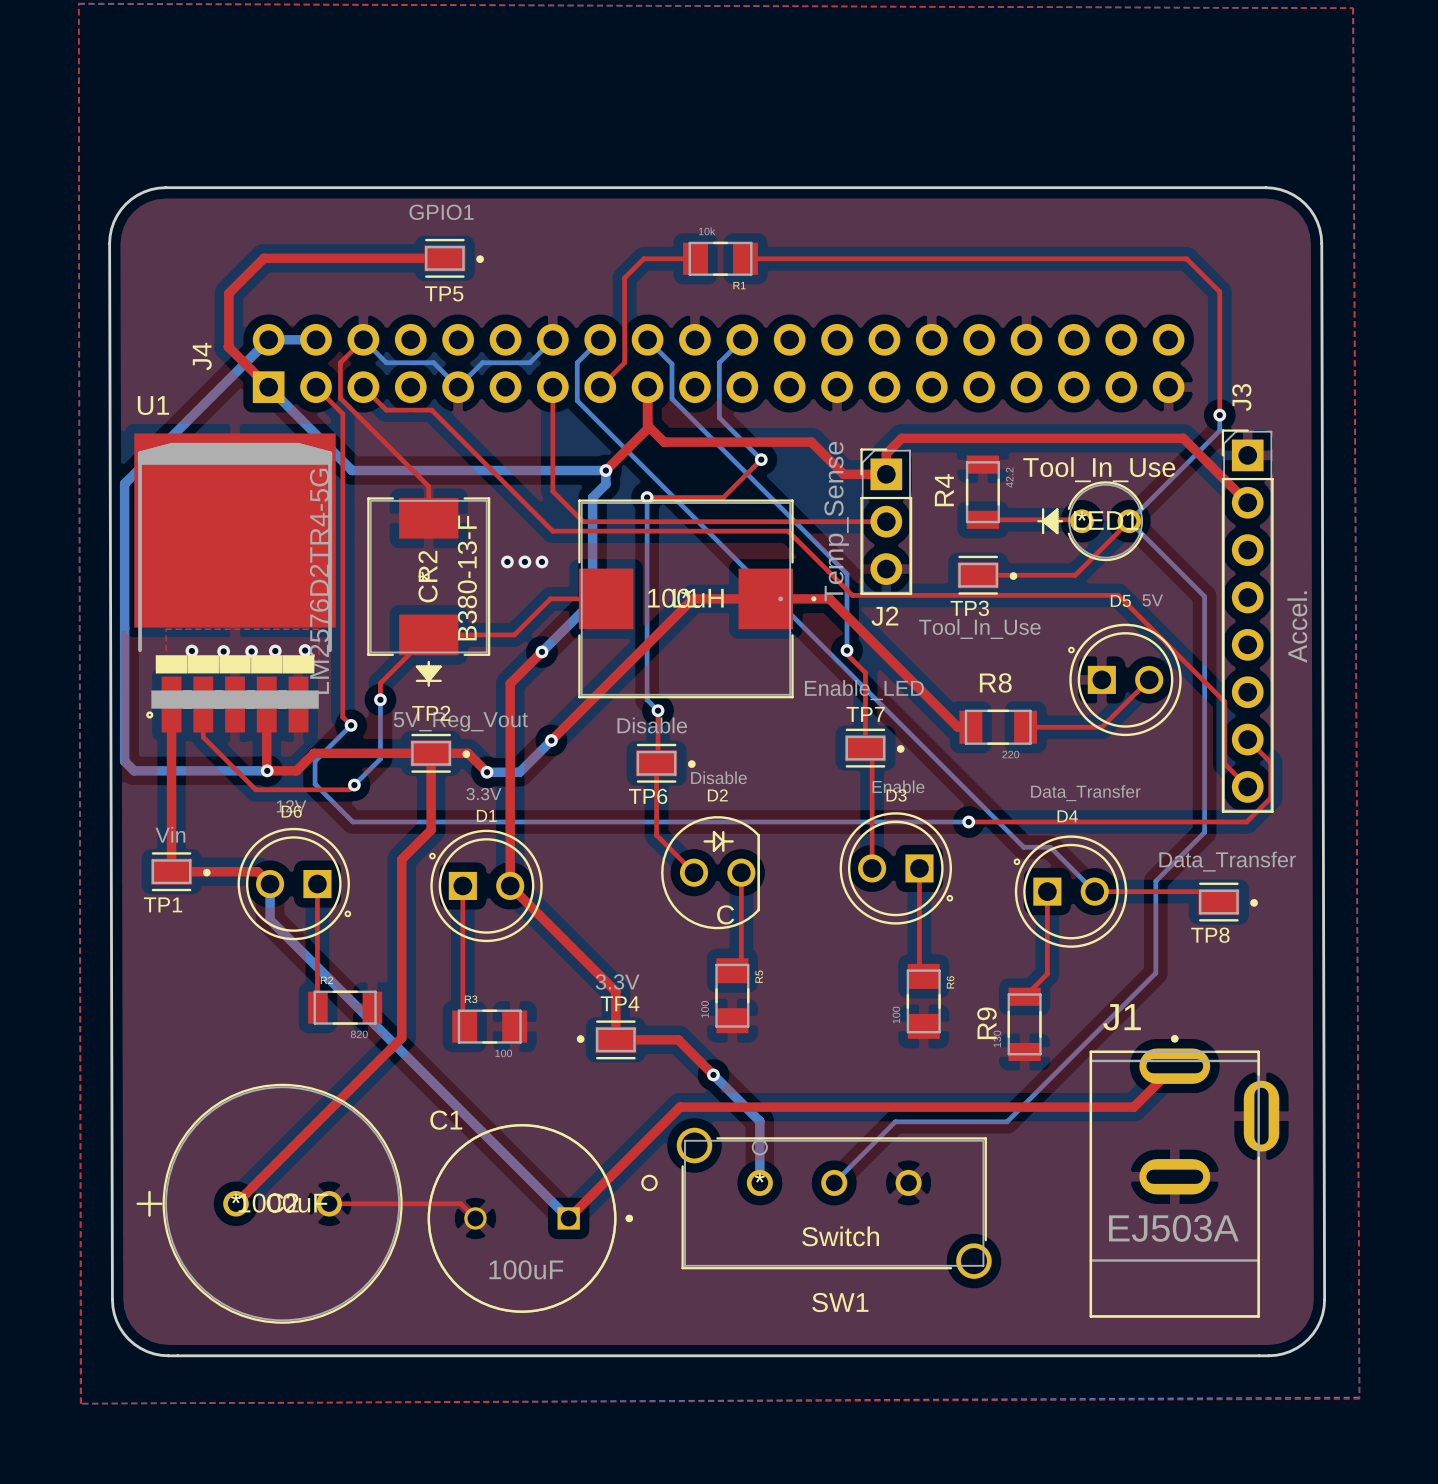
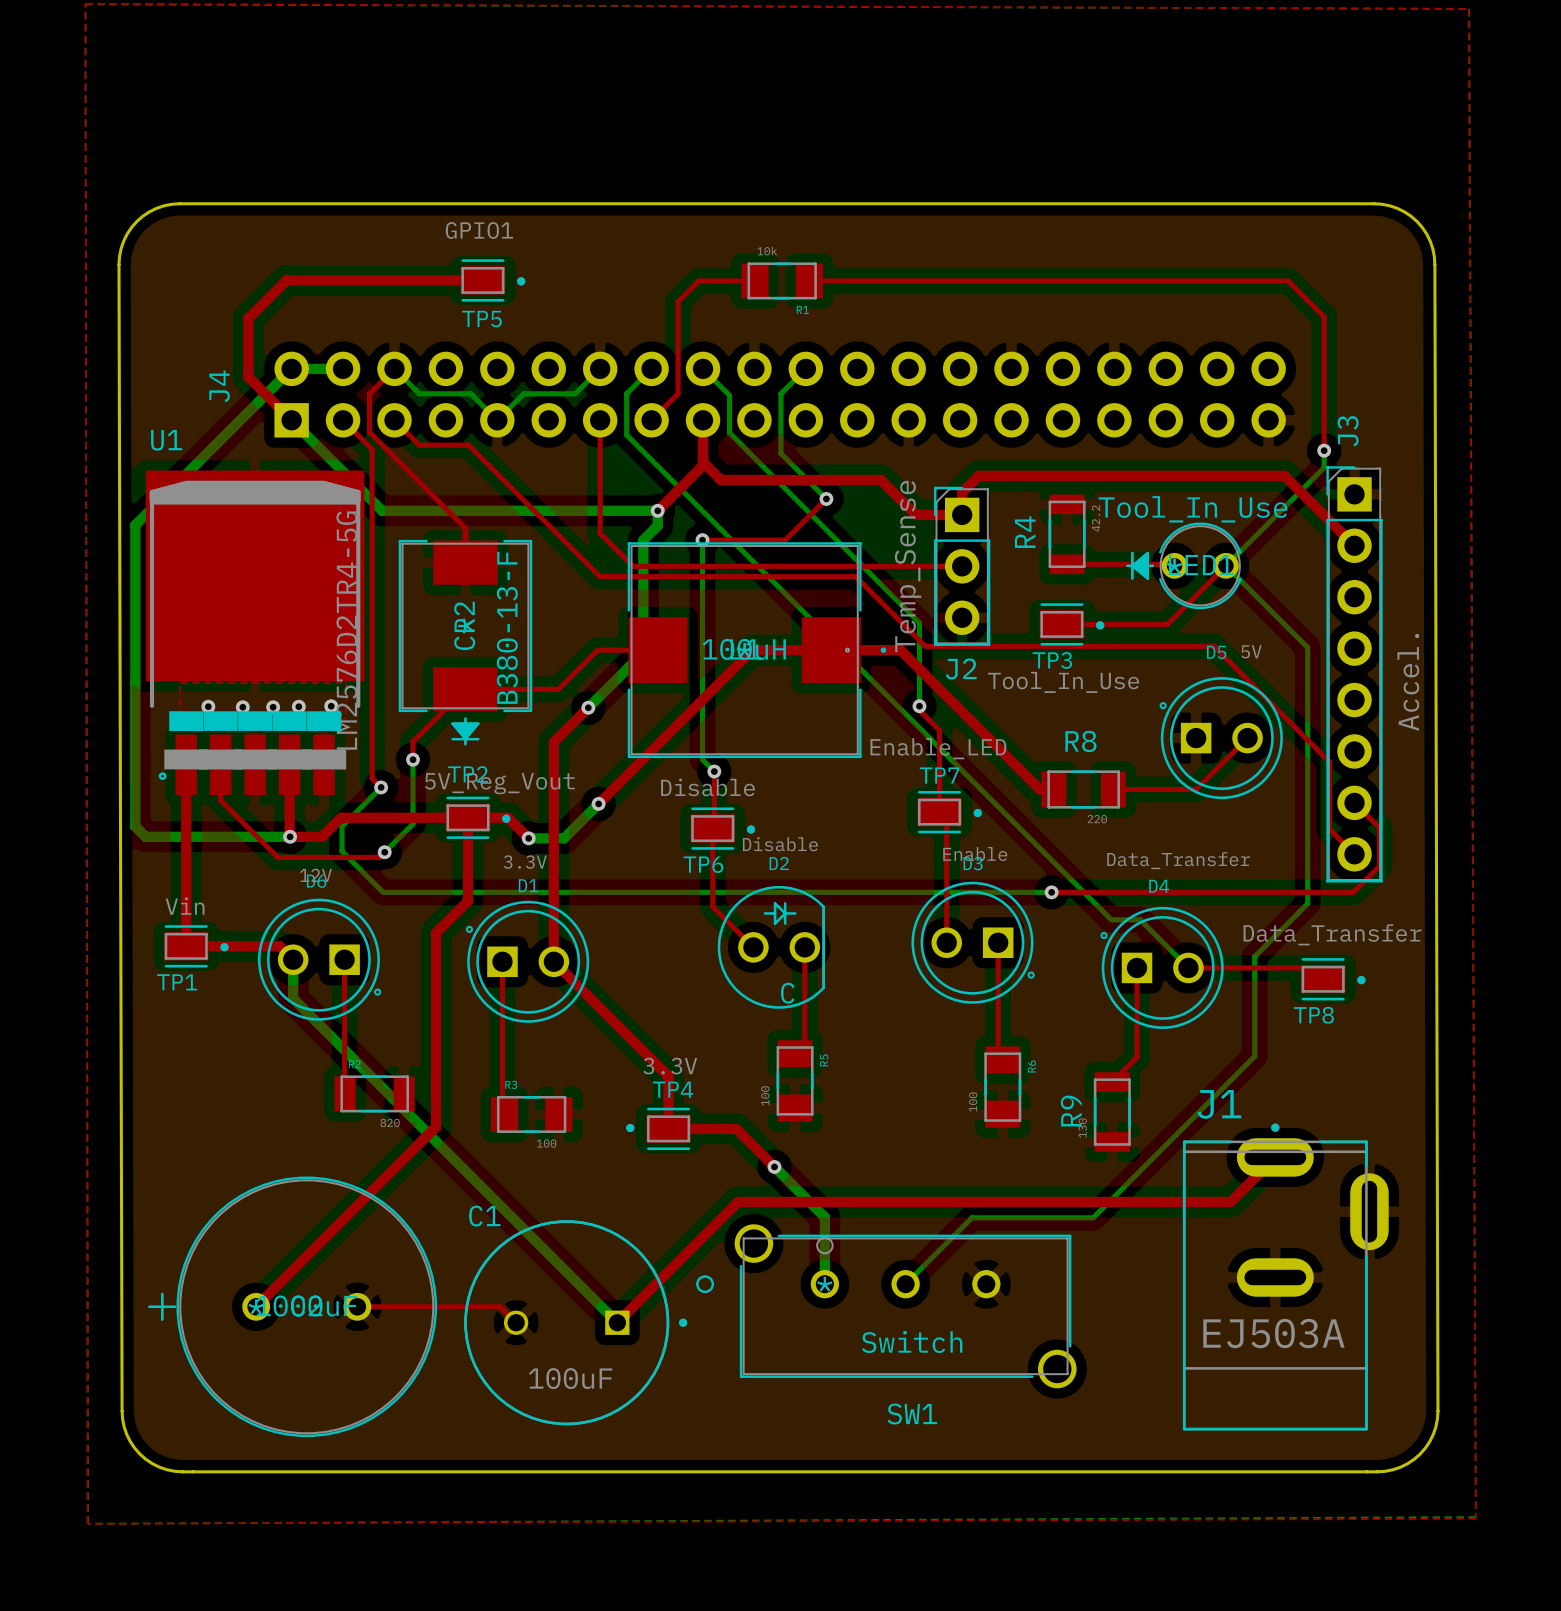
via: (507, 561) -> none
via: (524, 561) -> none
via: (541, 561) -> none

